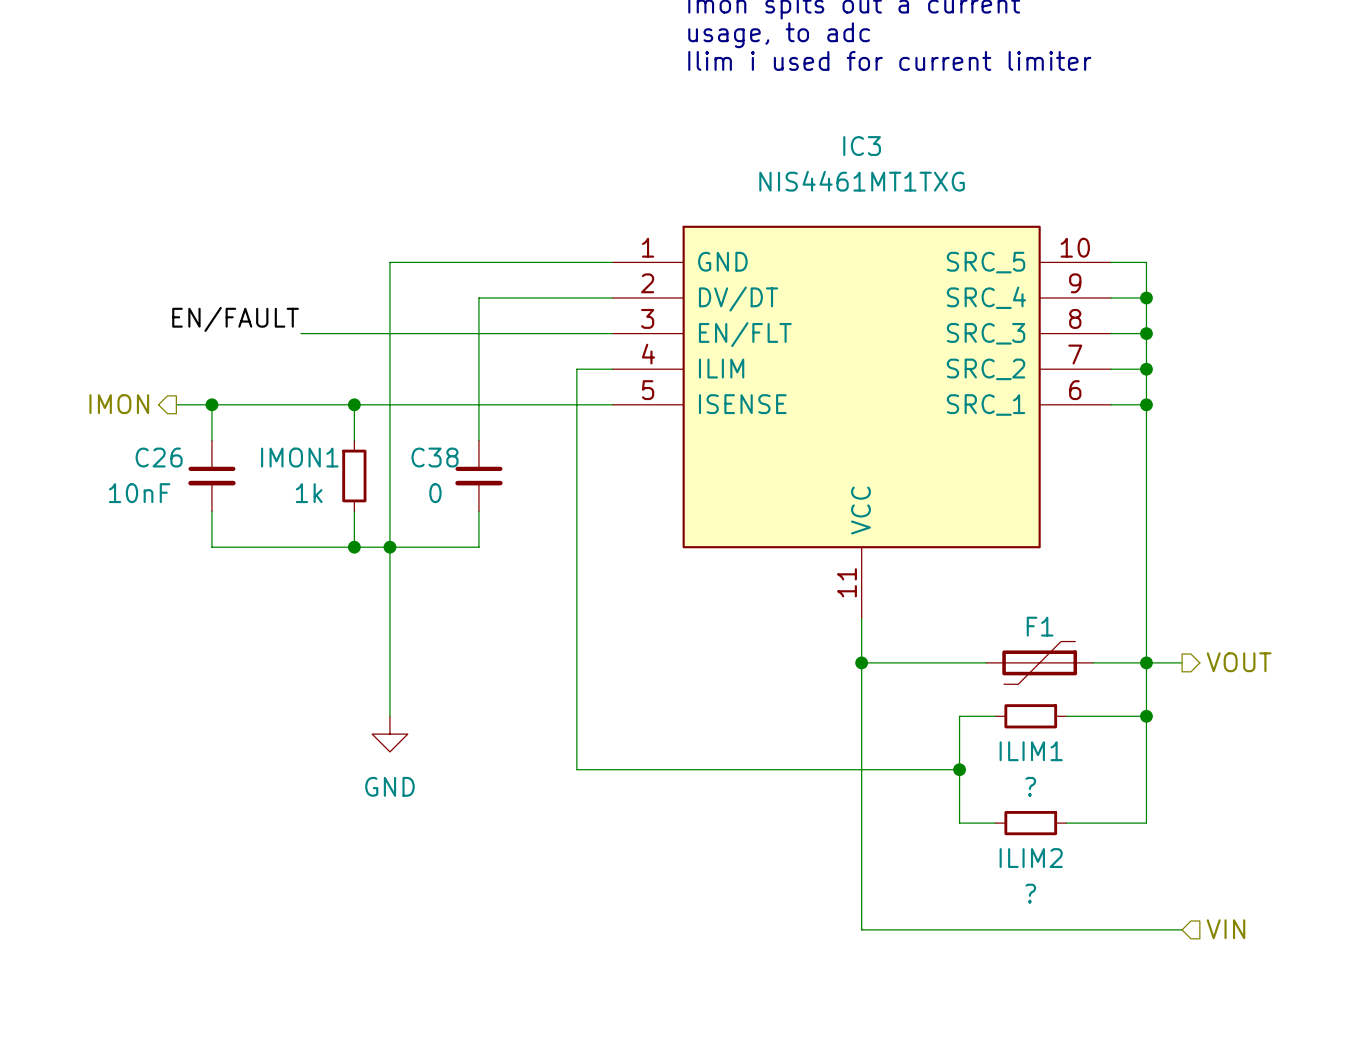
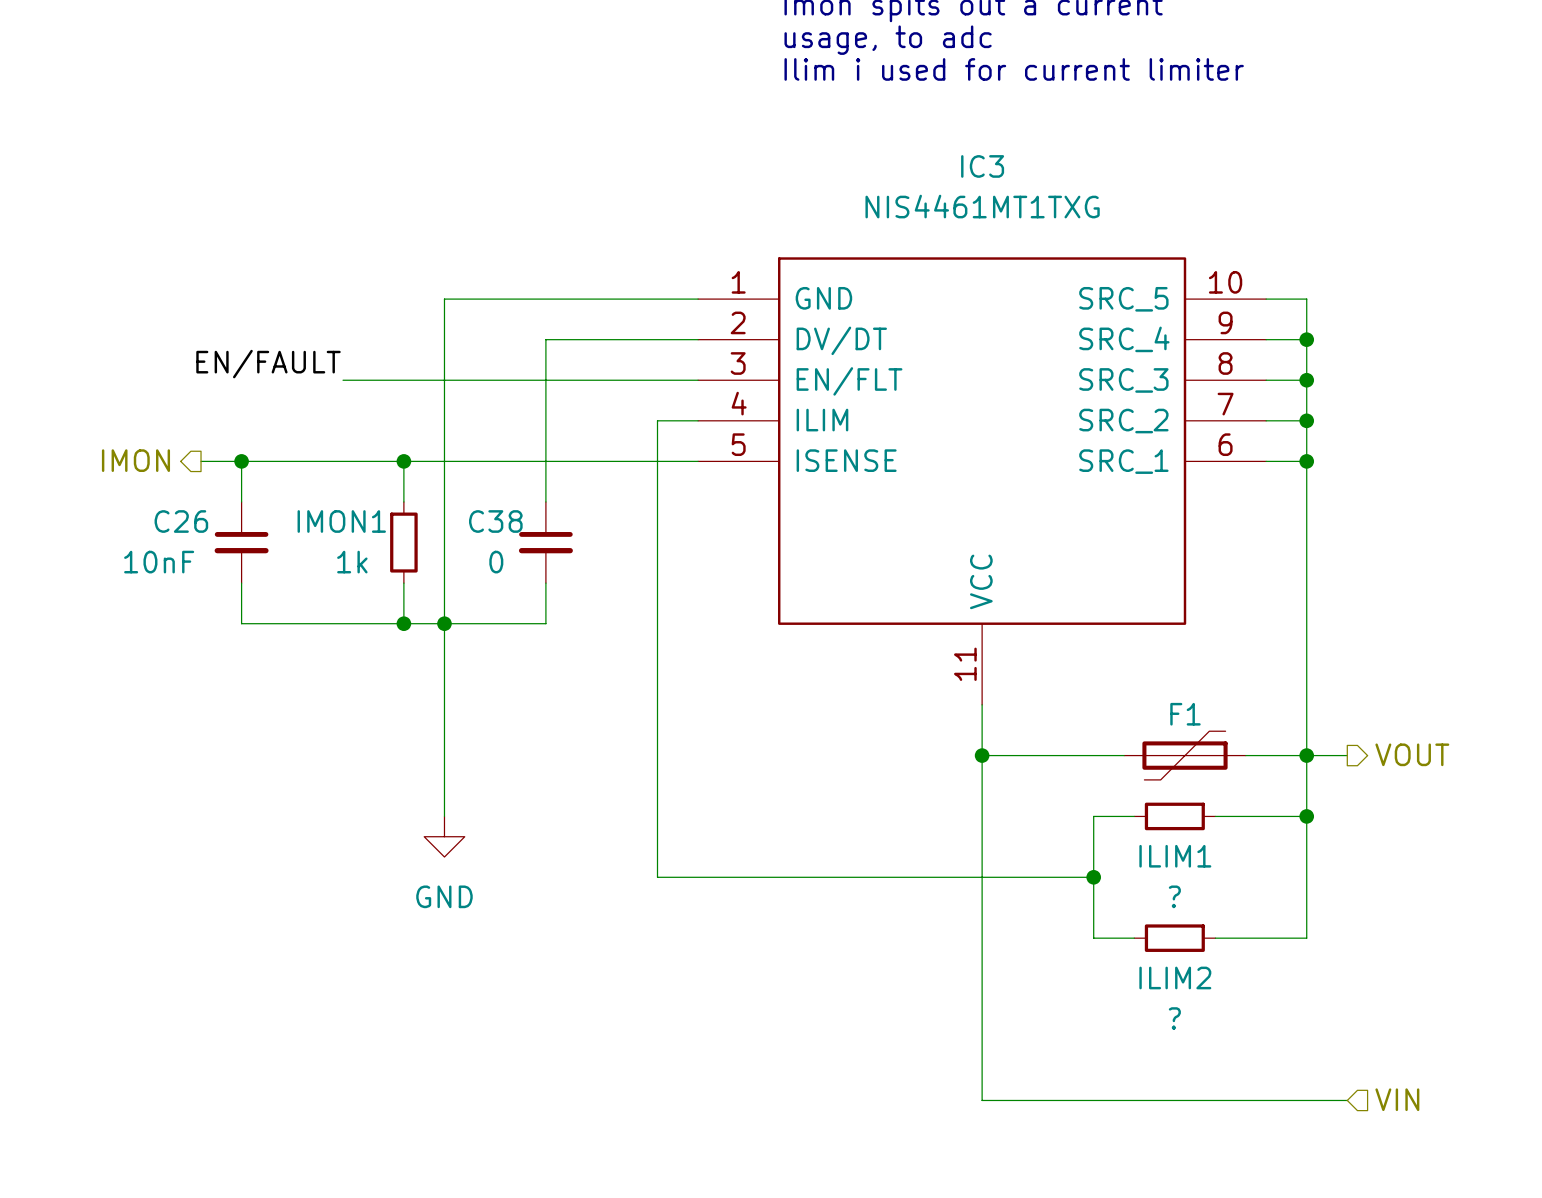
IC3 symbol: [612, 225, 1111, 619] -> [698, 257, 1267, 705]
wire: (861, 929) (1182, 929) -> (982, 1059) (982, 1100) (1347, 1100)
hierarchical label position: VIN (1225, 929) -> VIN (1397, 1099)

